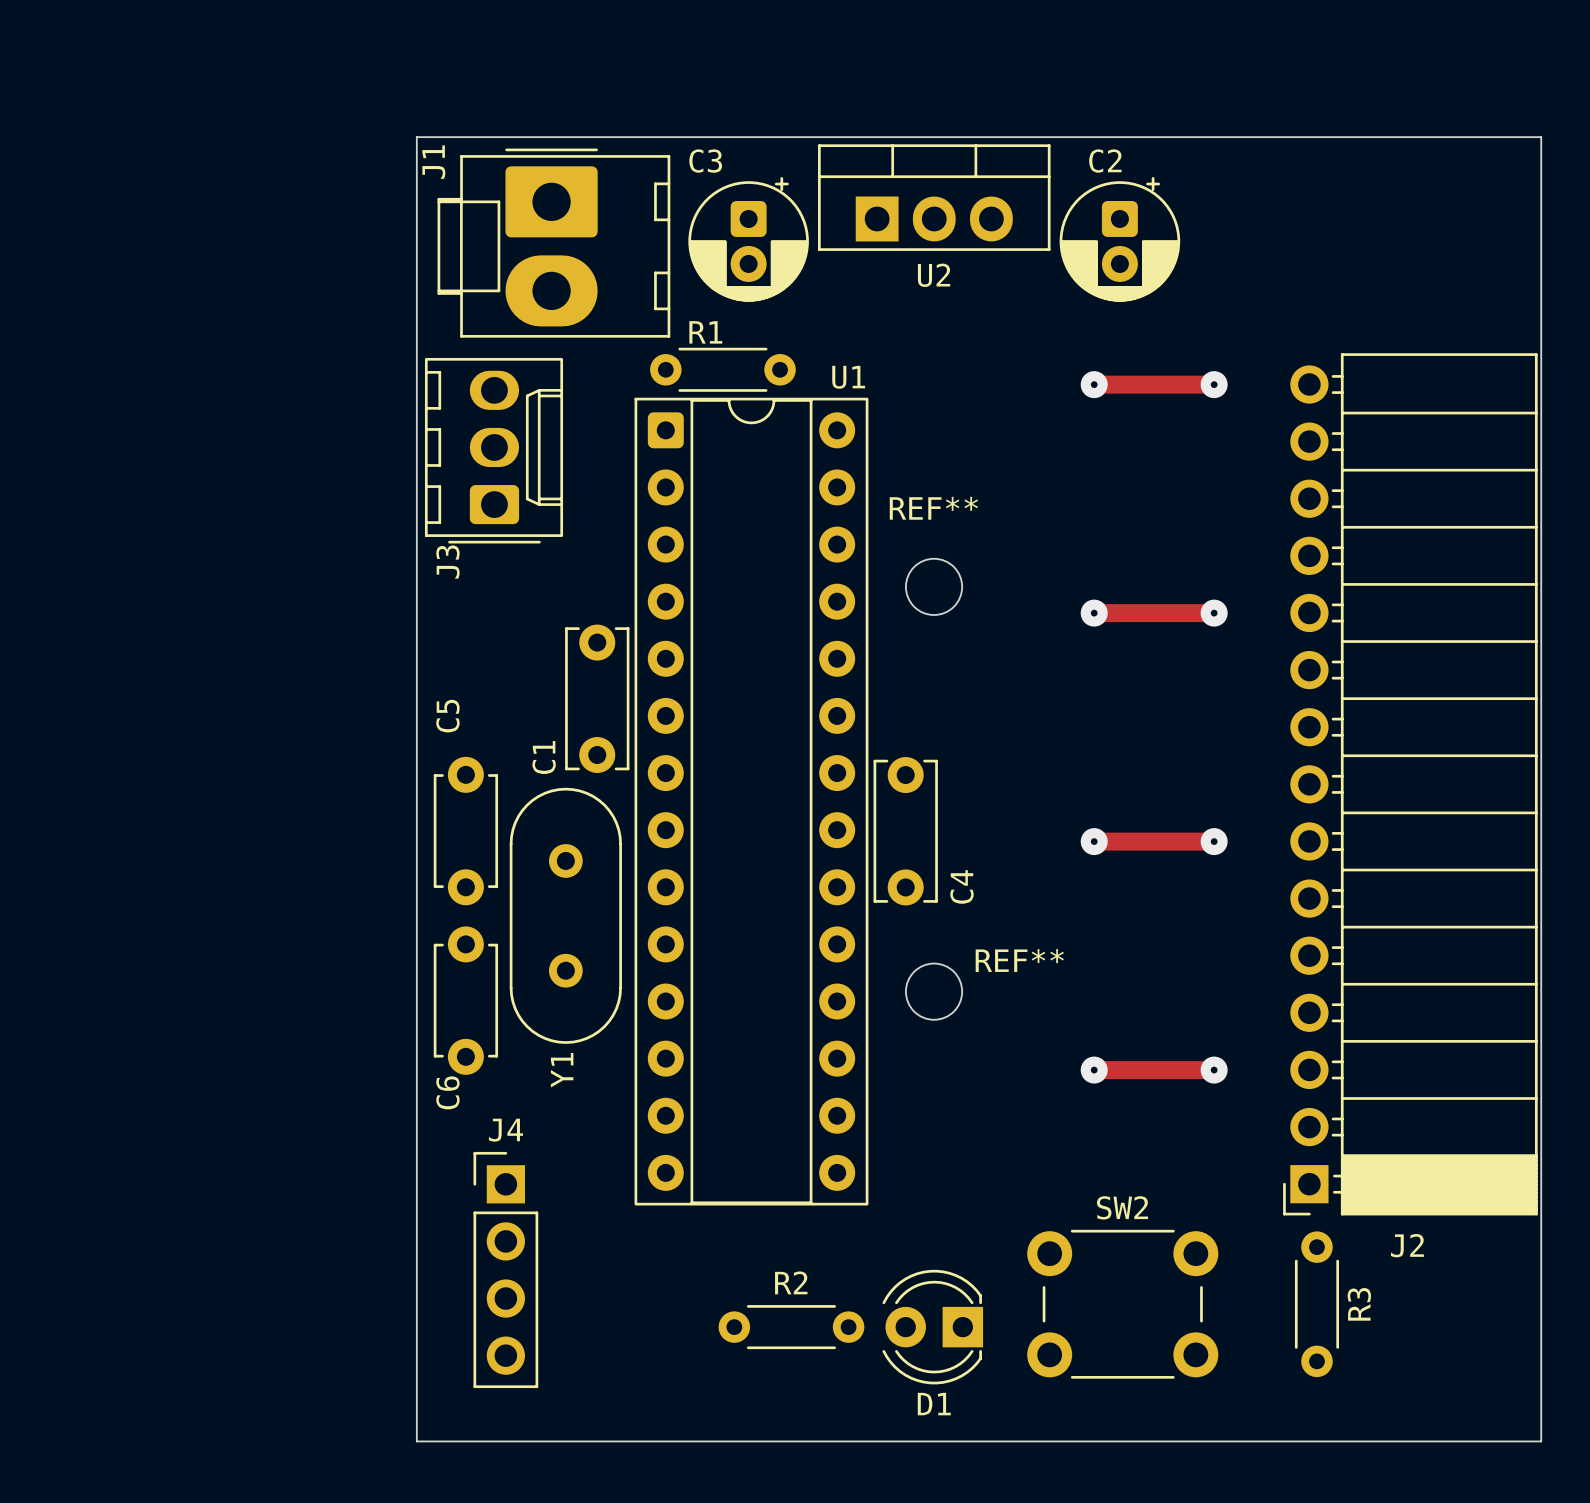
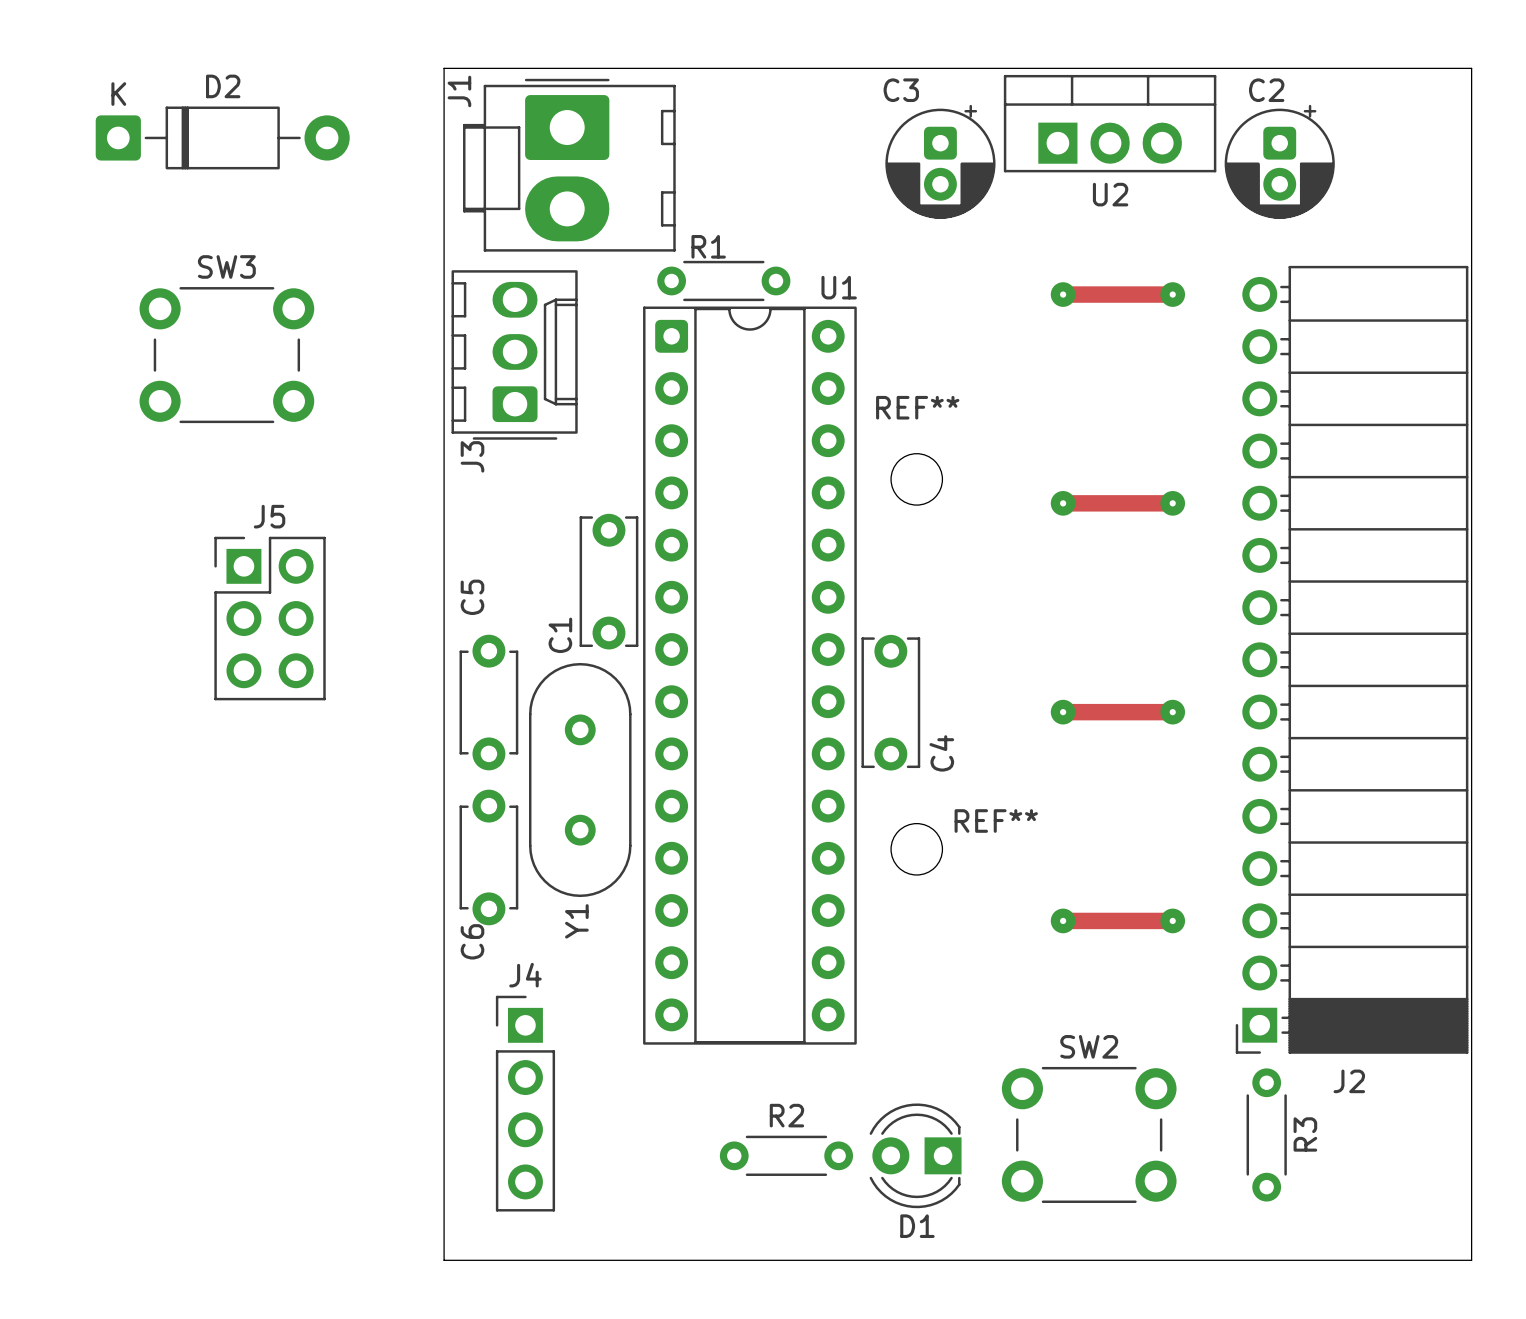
U2 position: (934, 197) -> (1110, 123)
D2: none -> (222, 137)
C3 position: (748, 239) -> (940, 161)
C2 position: (1119, 239) -> (1279, 161)
SW3: none -> (226, 355)
J5: none -> (270, 618)

